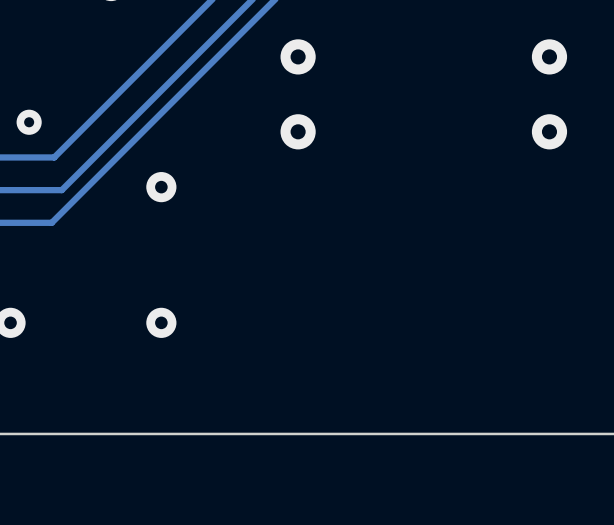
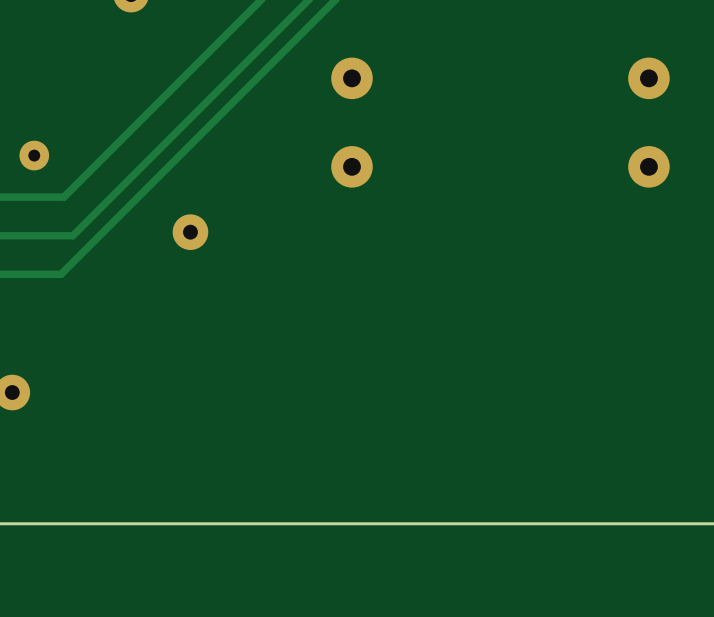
via: (161, 322) -> none

